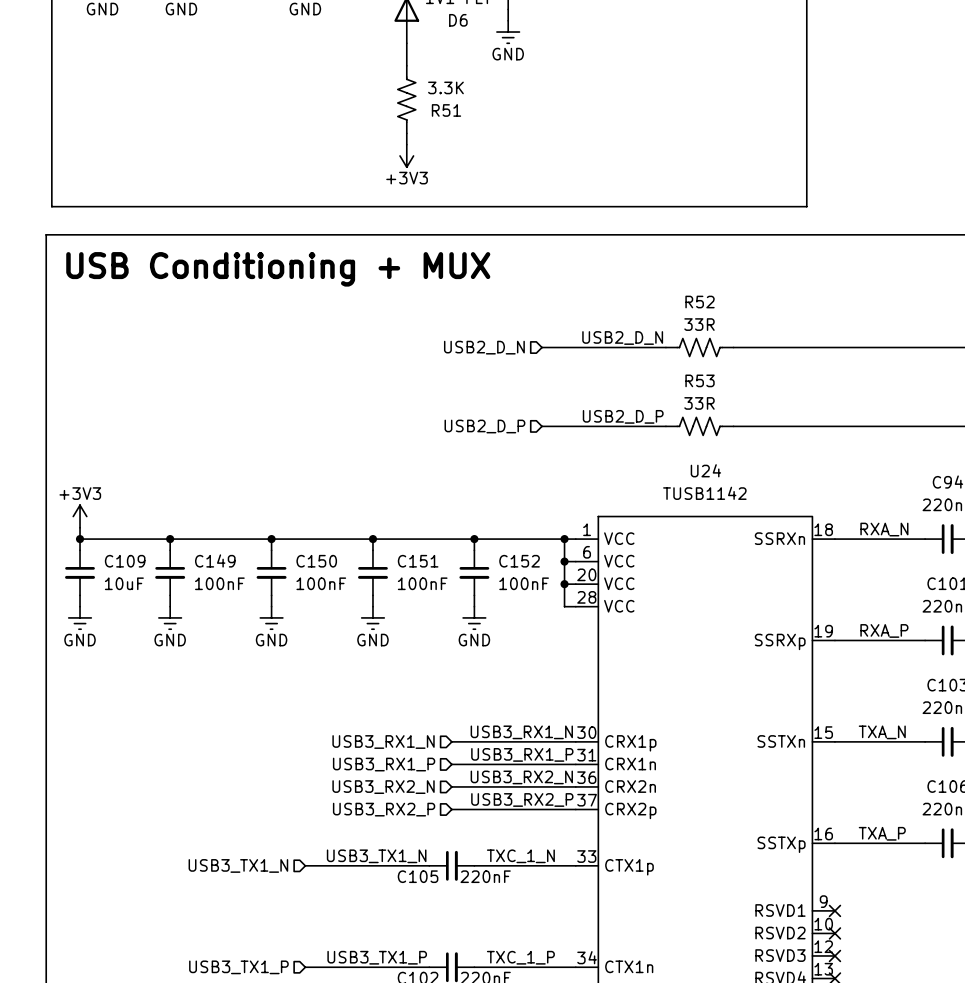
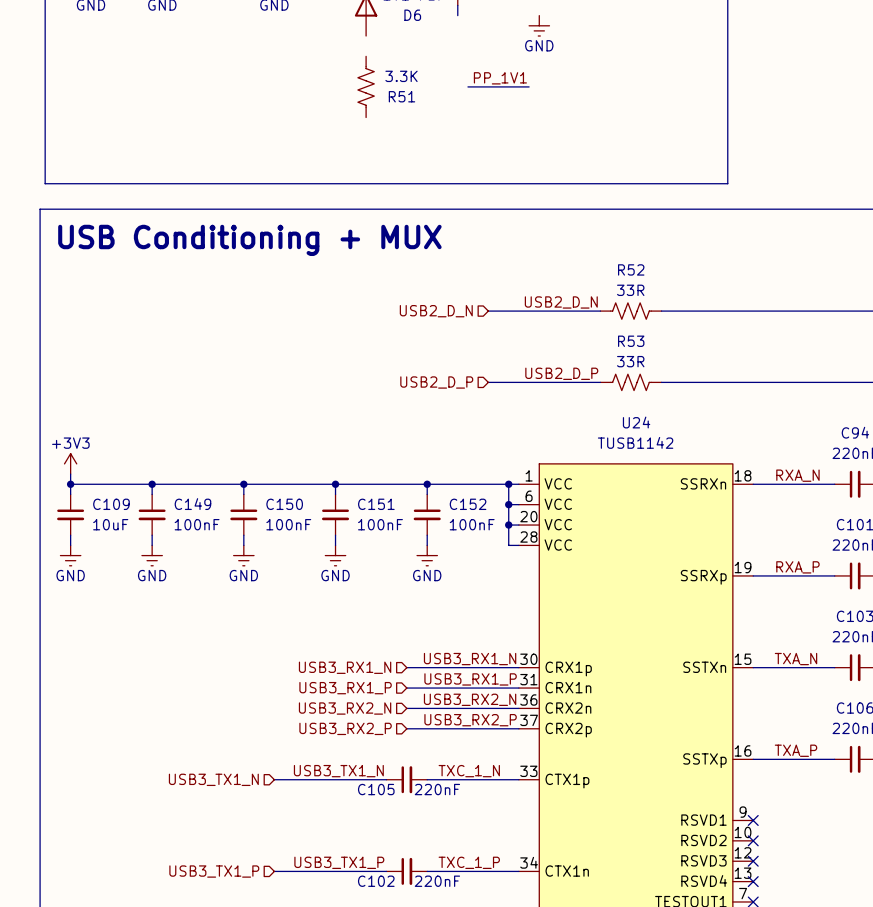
power symbol: GND (508, 32) -> none
power symbol: none -> GND (539, 25)
wire: (406, 43) (406, 65) -> none
label: none -> PP_1V1 (500, 78)
wire: none -> (467, 86) (529, 86)
wire: (406, 133) (406, 144) -> none
power symbol: +3V3 (406, 155) -> none

